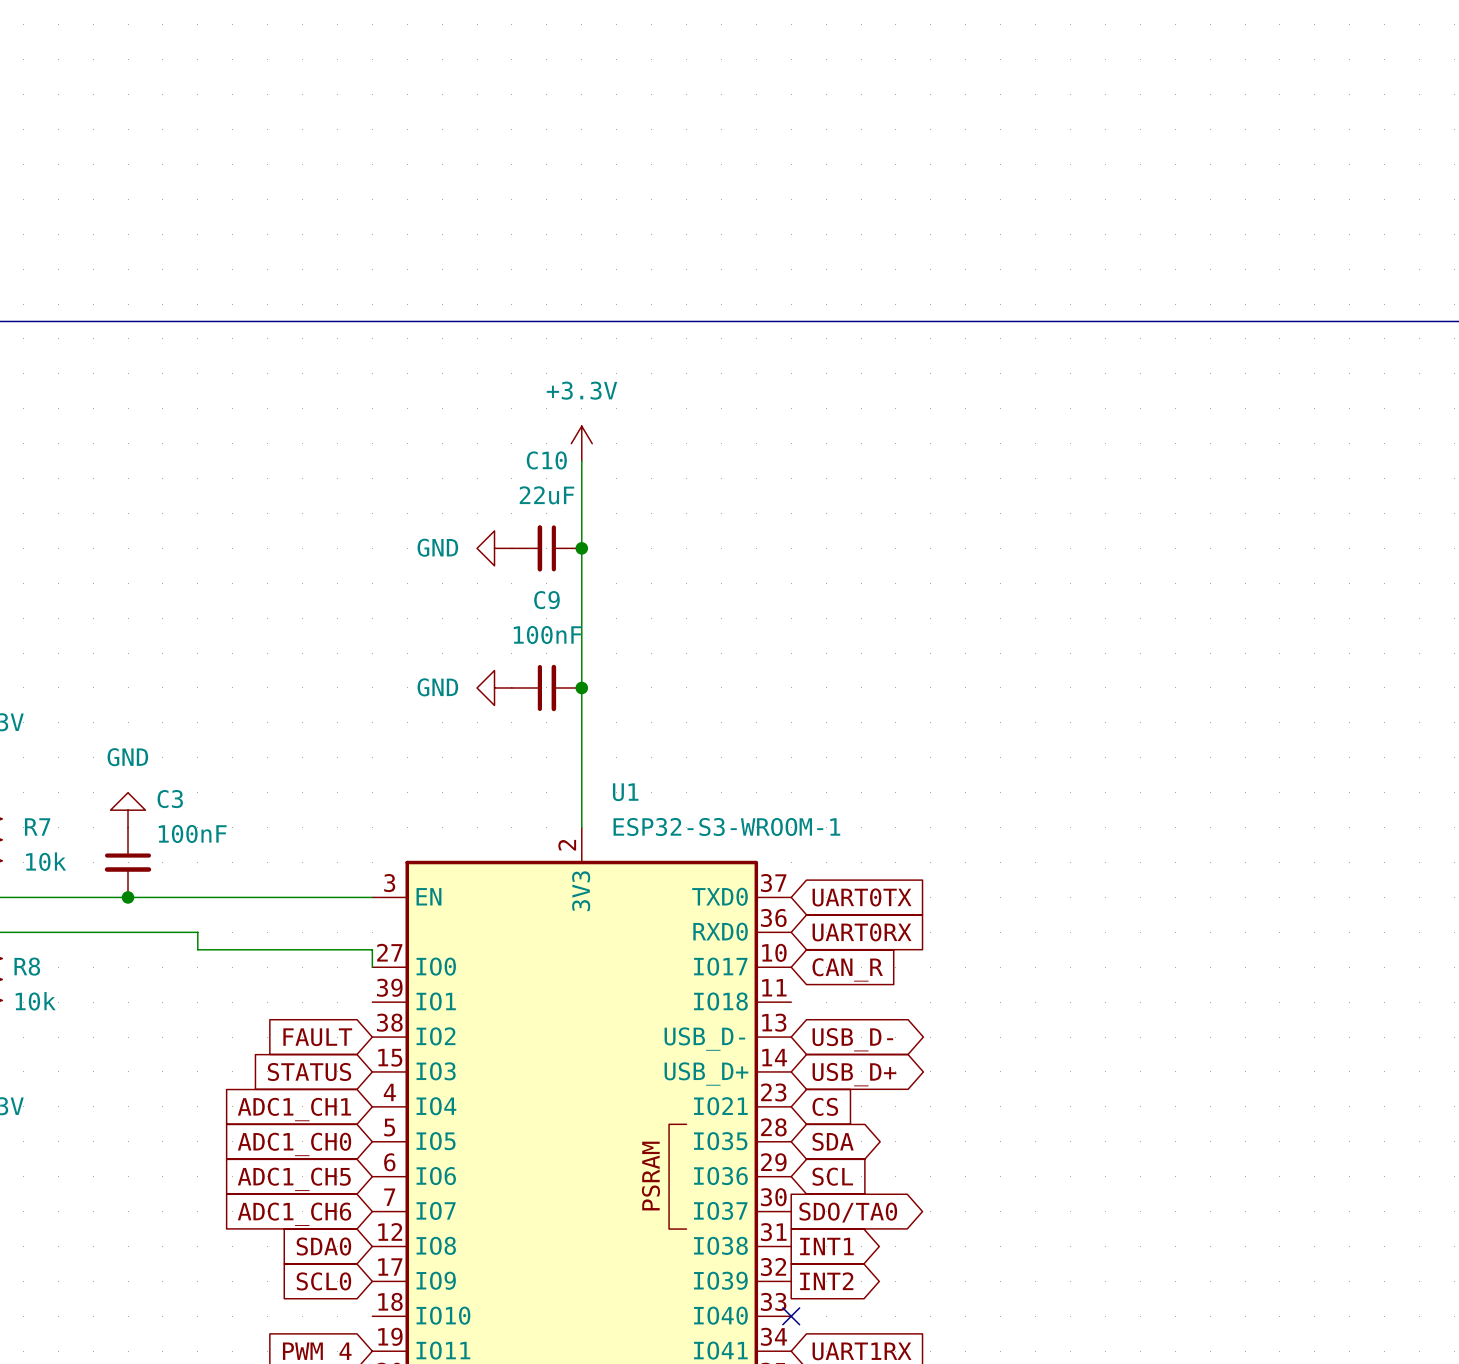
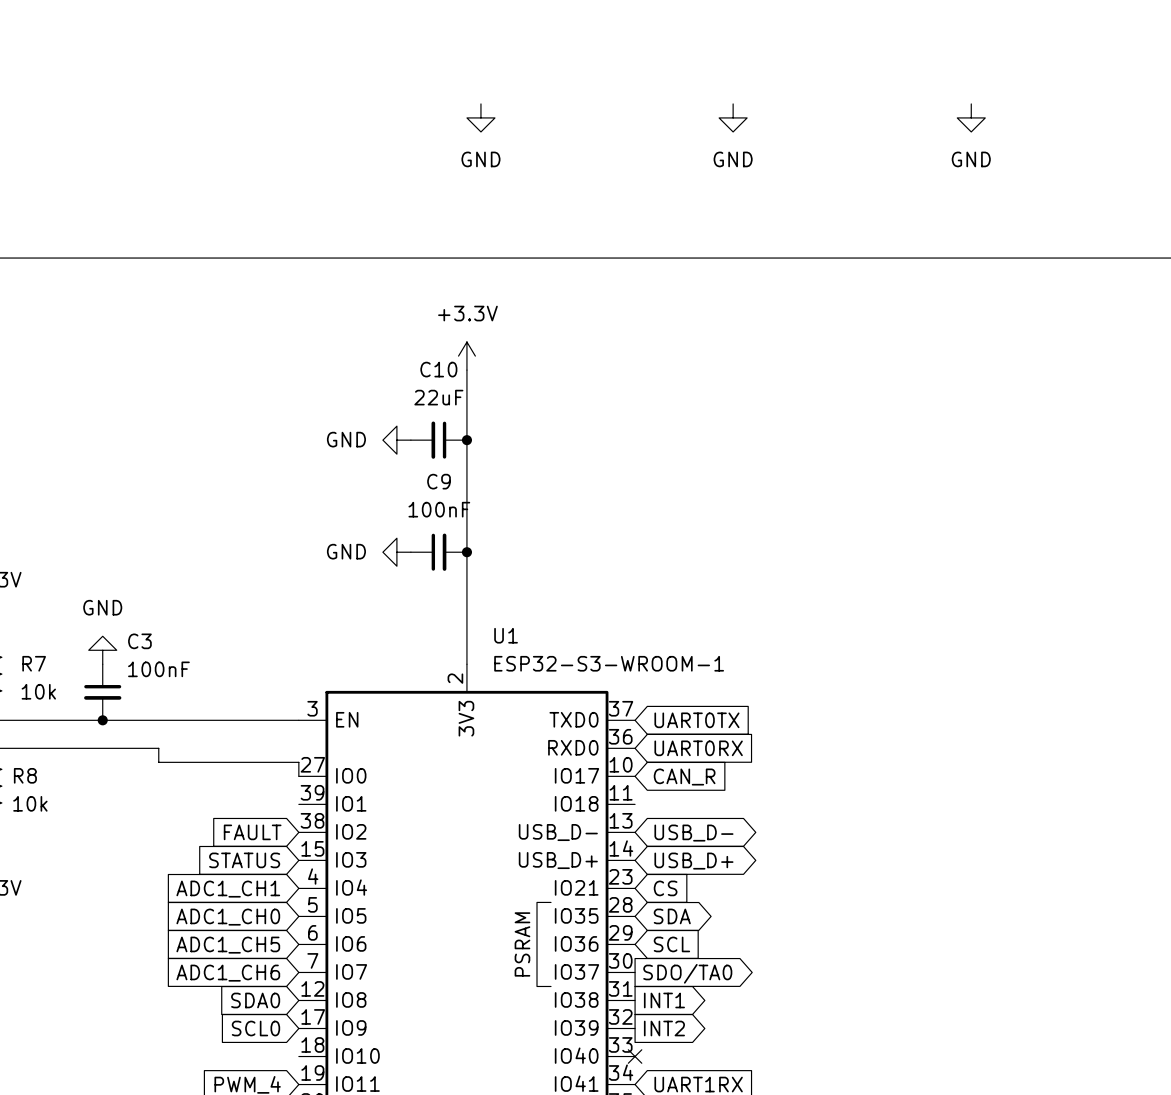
power symbol: none -> GND (480, 117)
power symbol: none -> GND (733, 117)
power symbol: none -> GND (971, 117)

